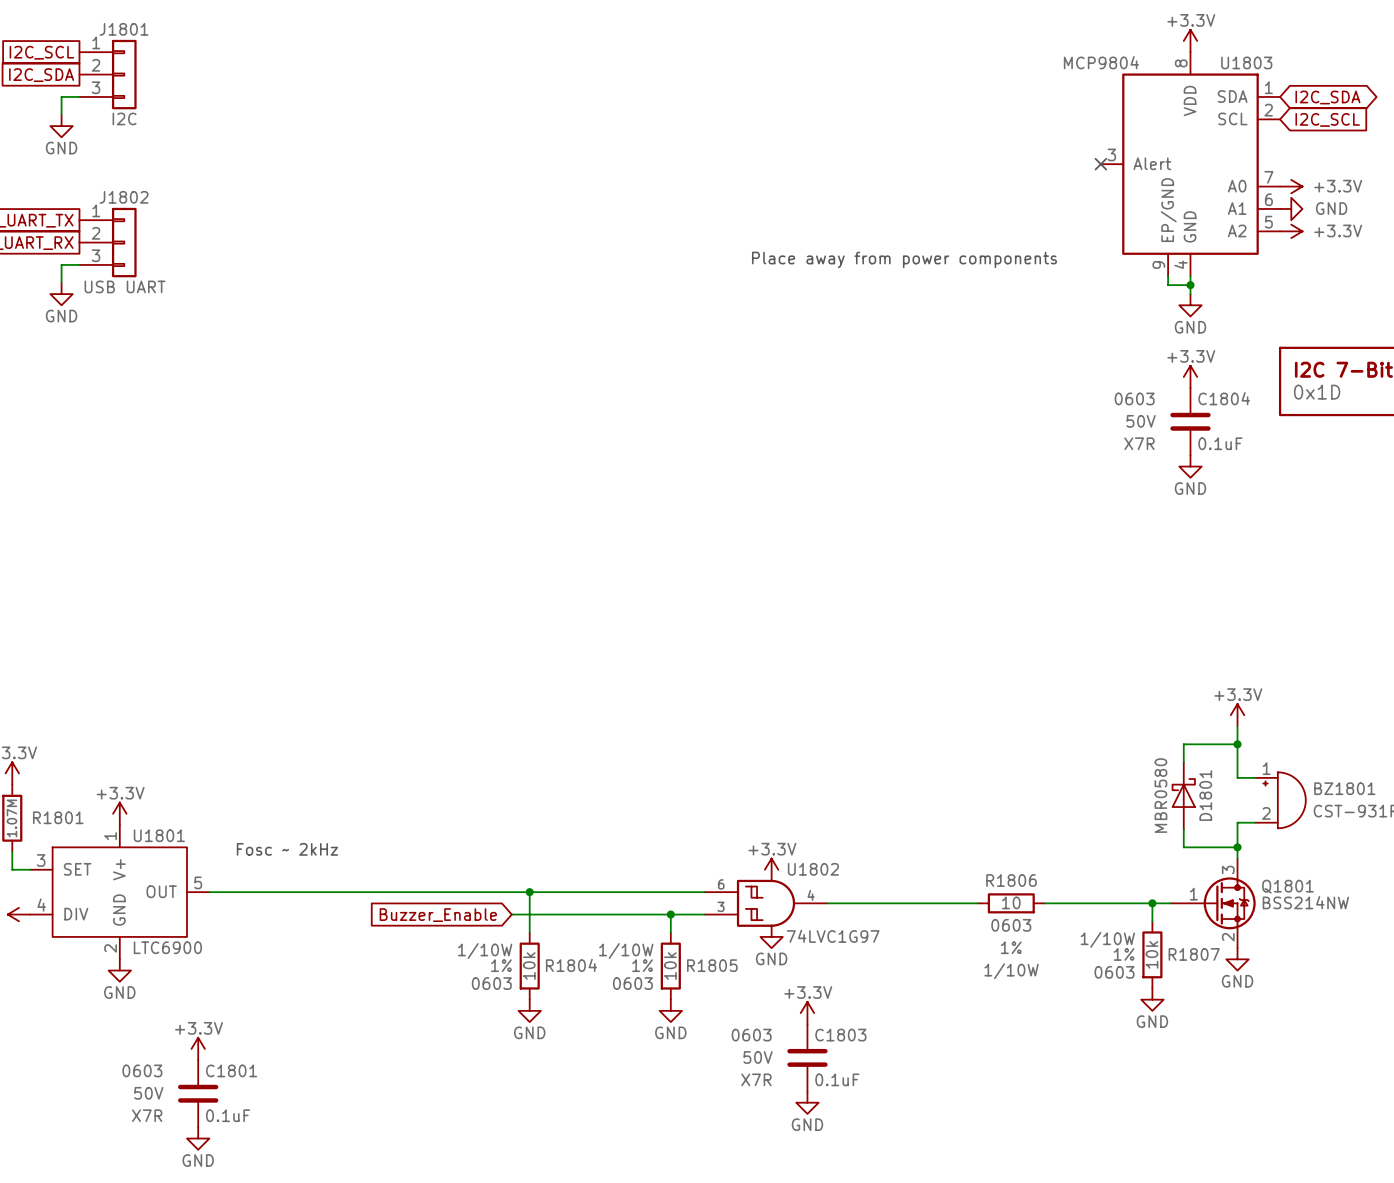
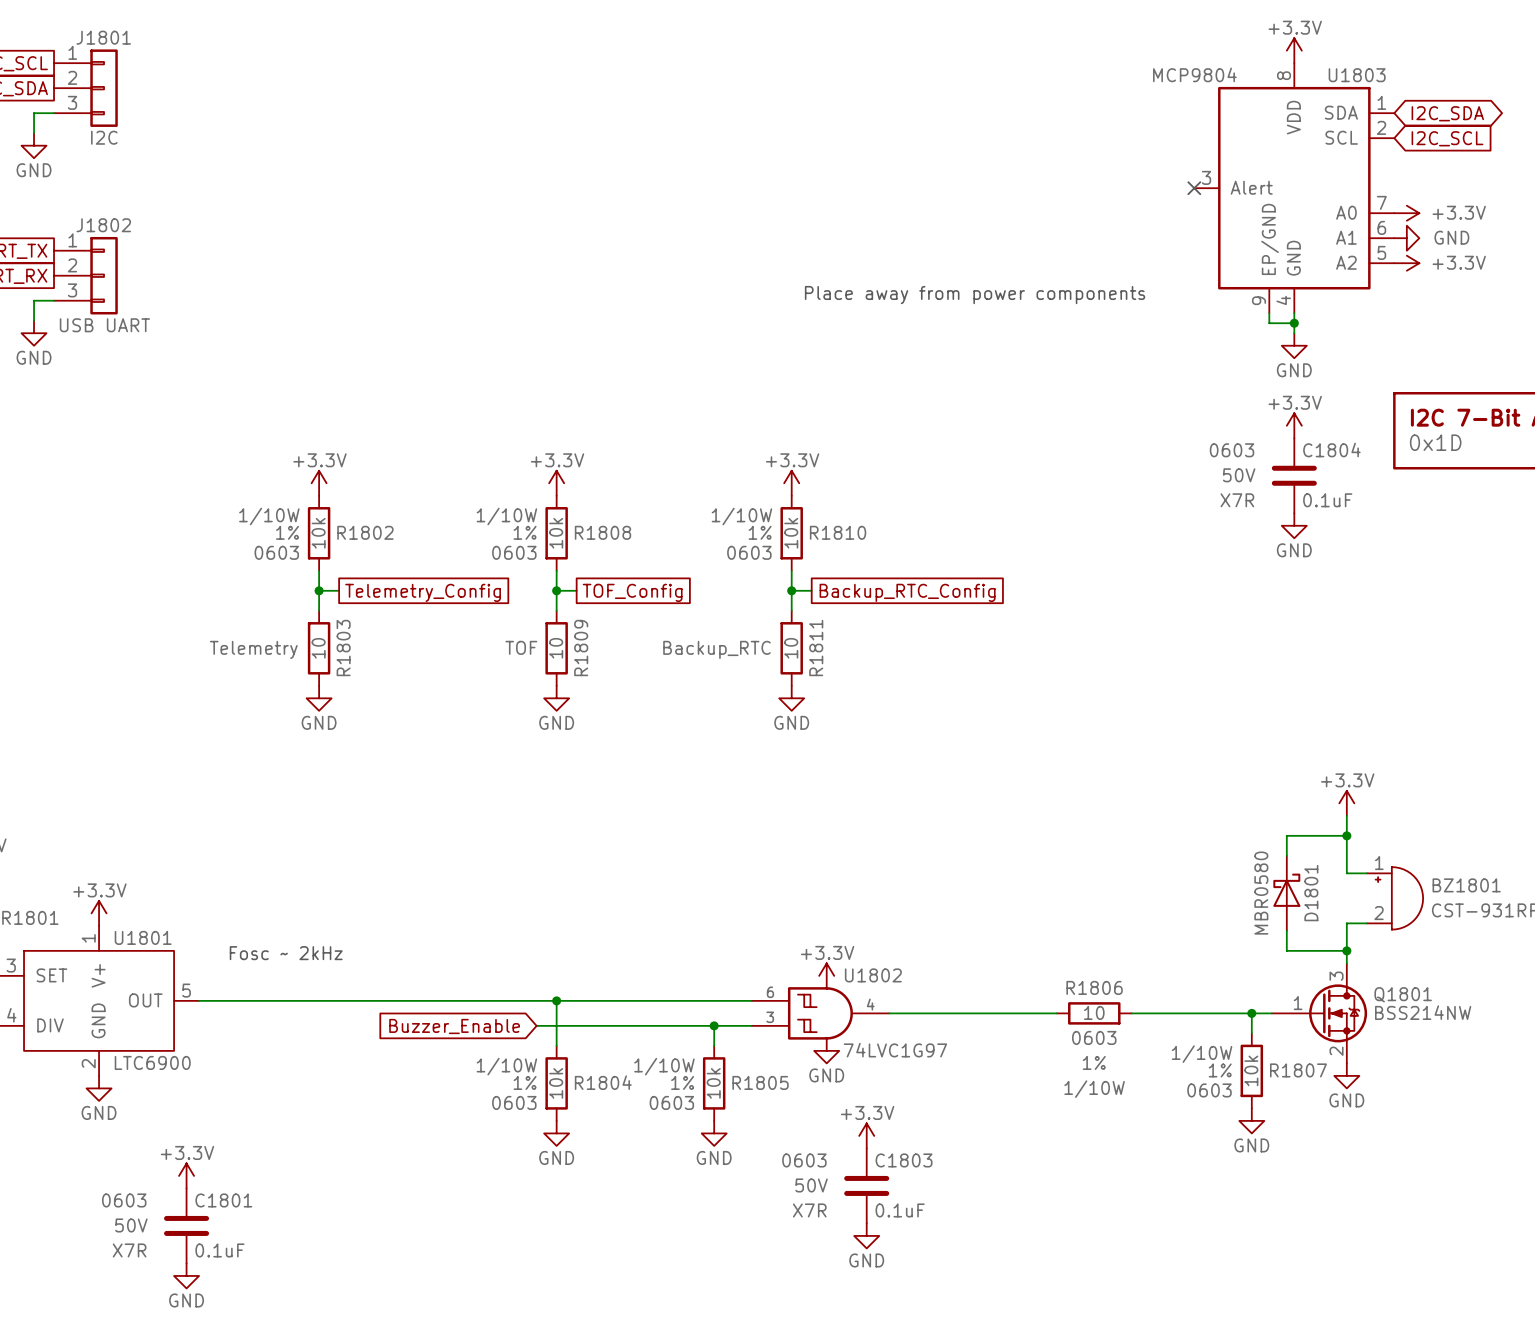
power symbol: none -> +3.3V (319, 483)
power symbol: none -> +3.3V (556, 483)
power symbol: none -> +3.3V (791, 483)
R1802: none -> 10k (319, 533)
R1808: none -> 10k (556, 533)
R1810: none -> 10k (791, 533)
wire: none -> (319, 570) (319, 610)
wire: none -> (556, 570) (556, 610)
wire: none -> (791, 570) (791, 610)
wire: none -> (319, 590) (339, 590)
junction: none -> (319, 590)
wire: none -> (556, 590) (576, 590)
junction: none -> (556, 590)
wire: none -> (791, 590) (811, 590)
junction: none -> (791, 590)
global label: none -> Telemetry_Config (423, 592)
global label: none -> TOF_Config (632, 592)
global label: none -> Backup_RTC_Config (907, 592)
R1803: none -> 10 (319, 648)
R1809: none -> 10 (556, 648)
R1811: none -> 10 (791, 648)
power symbol: none -> GND (319, 698)
power symbol: none -> GND (556, 698)
power symbol: none -> GND (791, 698)

